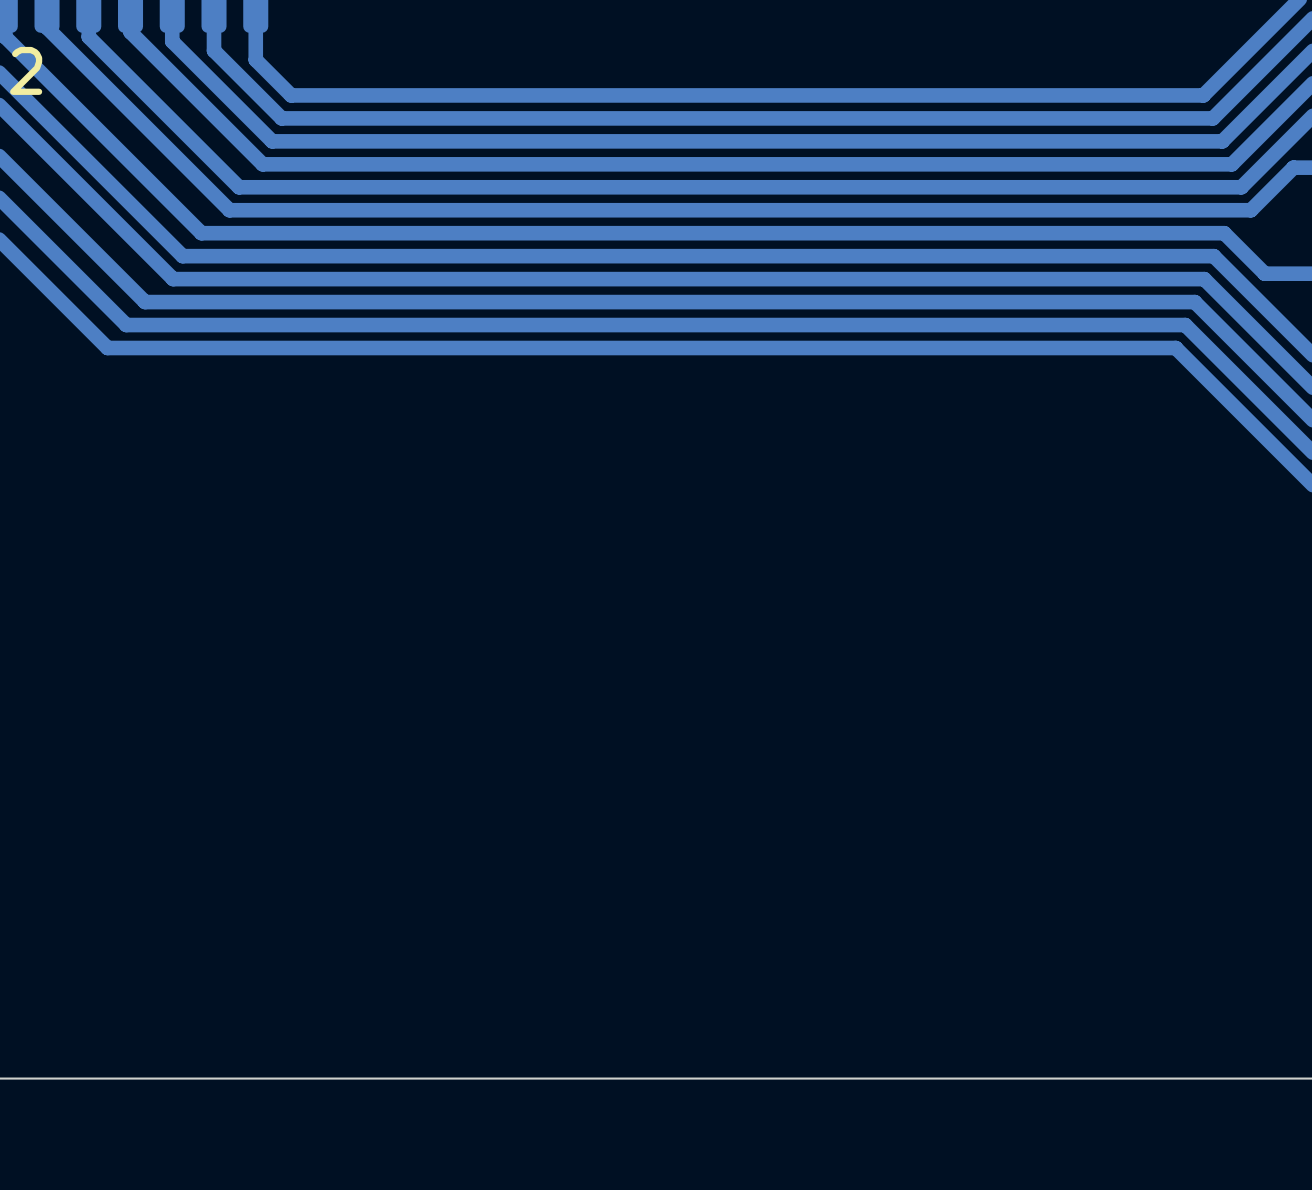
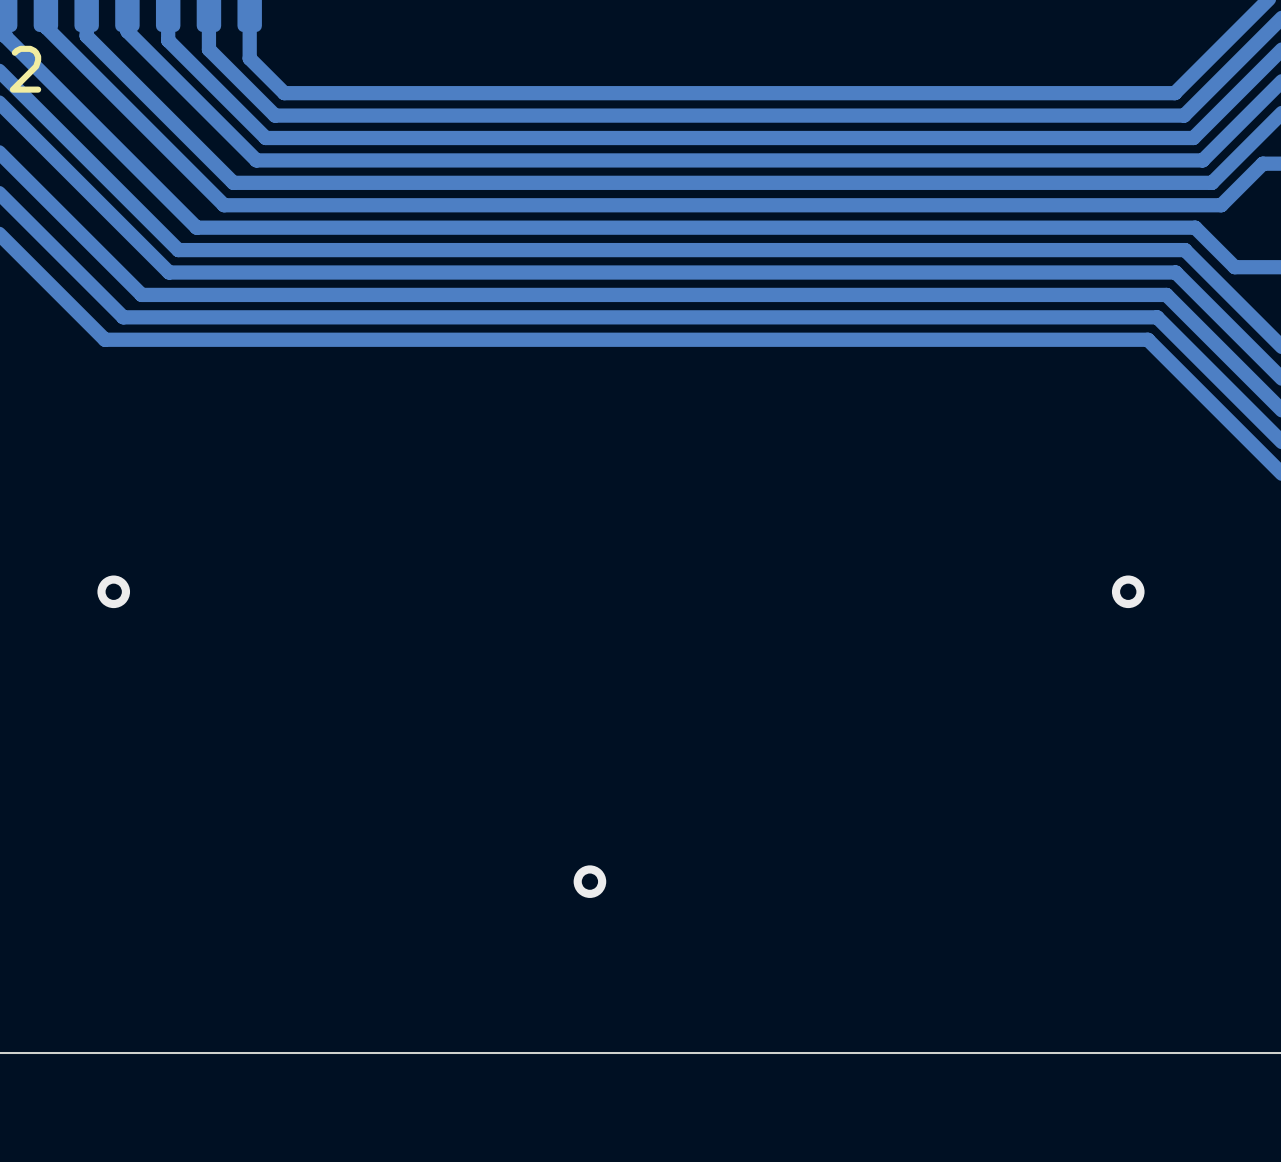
via: none -> (113, 591)
via: none -> (1128, 591)
via: none -> (589, 881)

